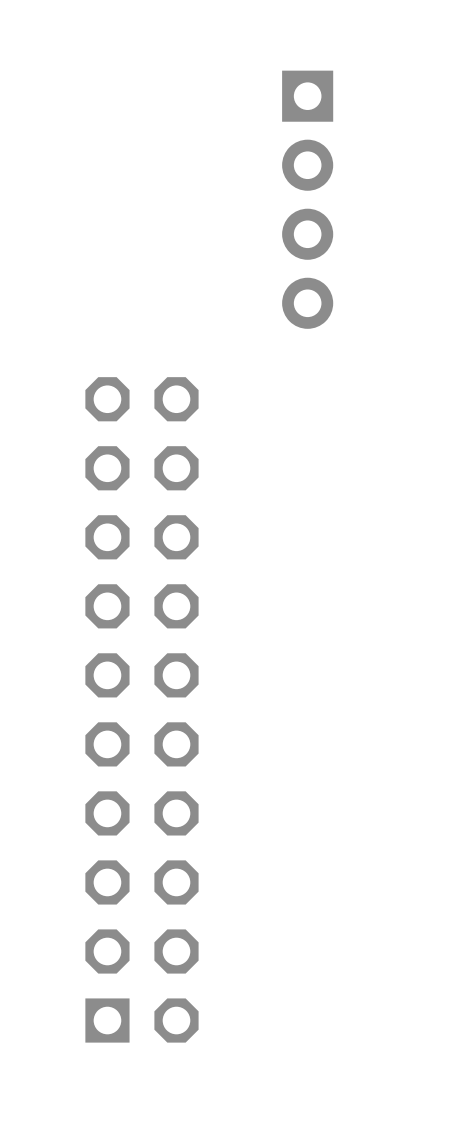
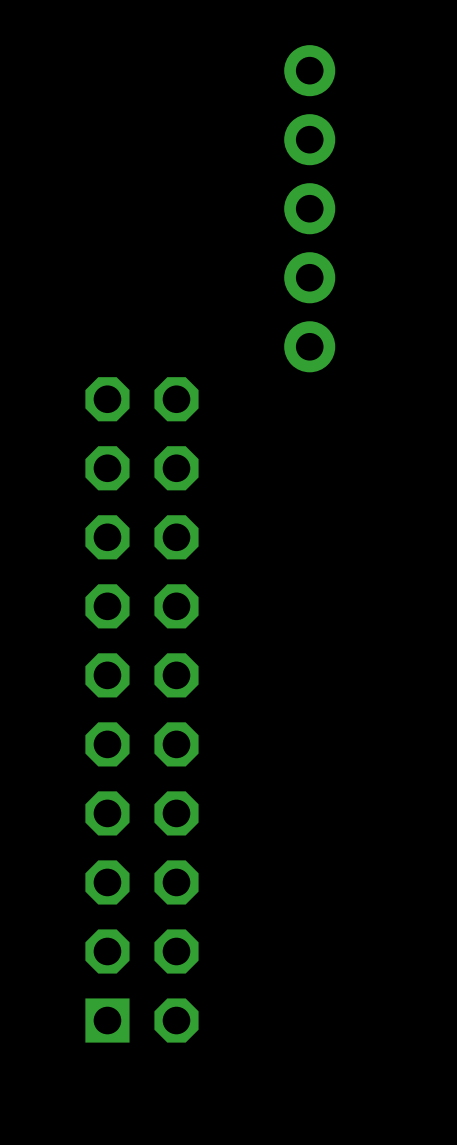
part footprint: [282, 70, 334, 329] -> [284, 45, 336, 373]

